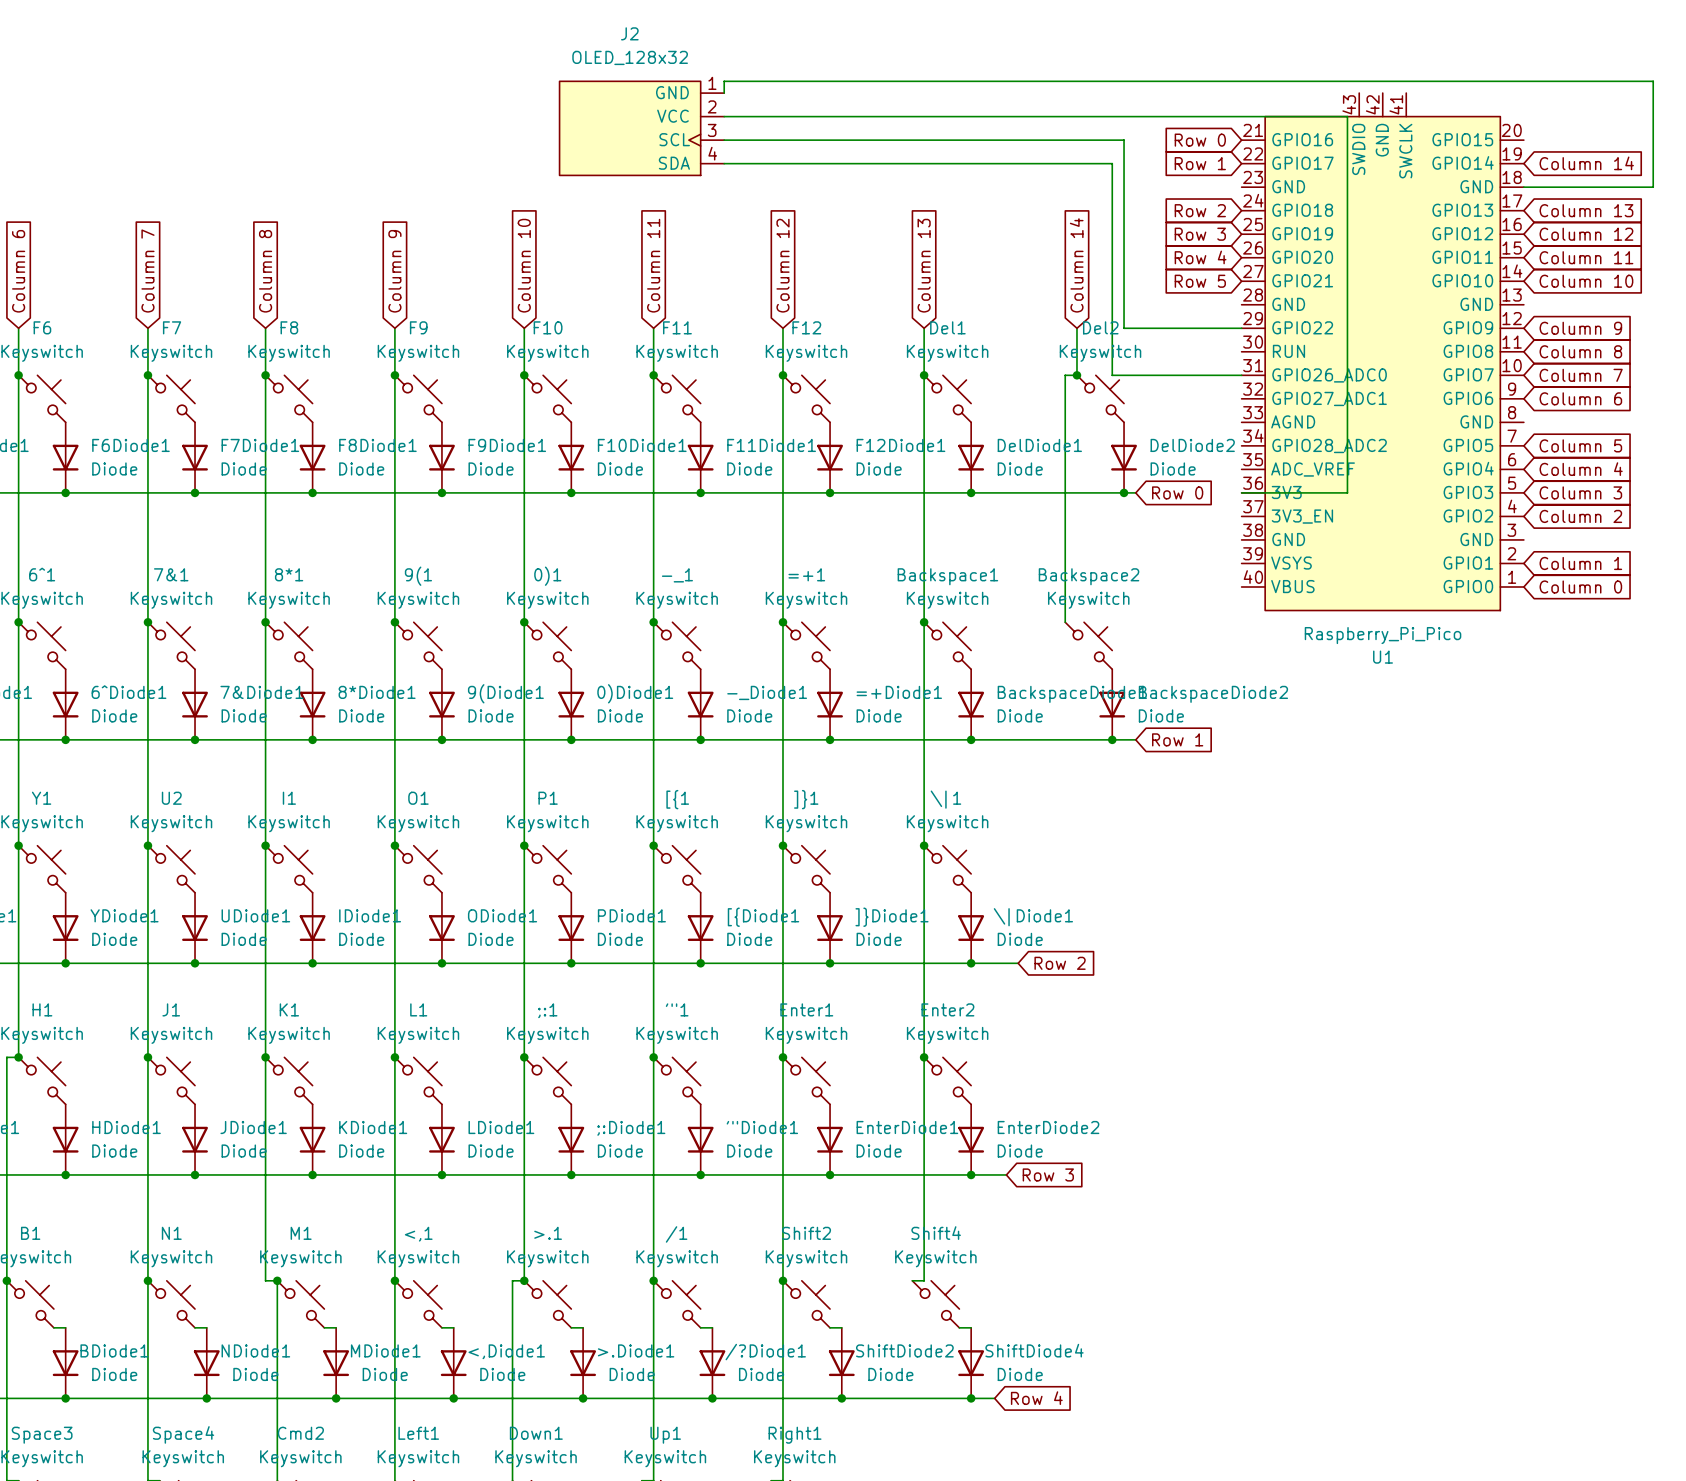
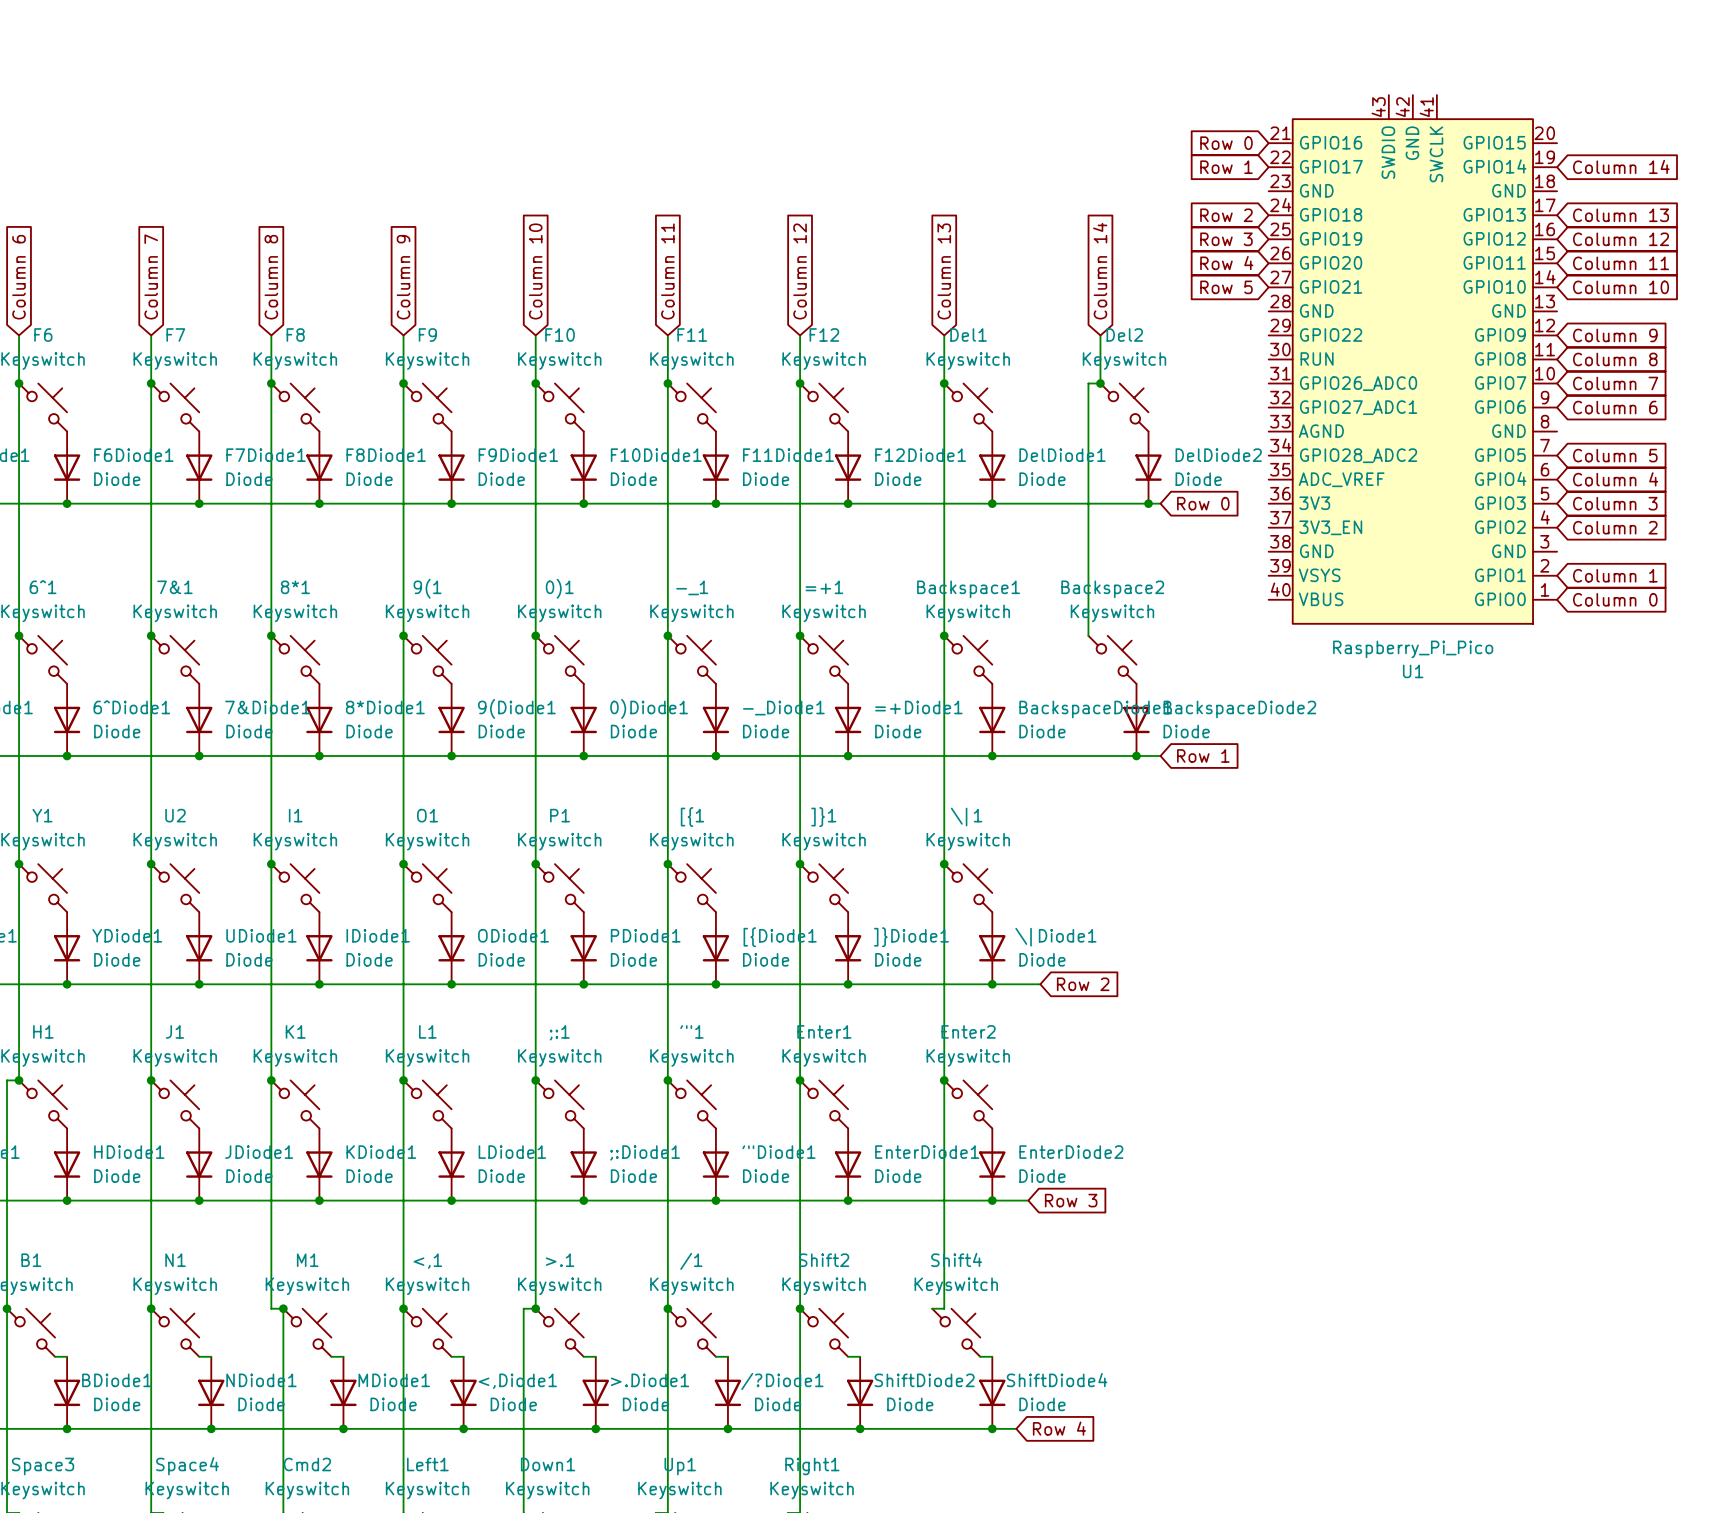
wire: (724, 93) (724, 81) (1653, 81) (1653, 187) (1523, 187) -> none
wire: (724, 116) (1347, 116) (1347, 492) (1241, 492) -> none
J2: OLED_128x32 (641, 128) -> none
wire: (724, 140) (1124, 140) (1124, 328) (1241, 328) -> none
wire: (724, 163) (1112, 163) (1112, 375) (1241, 375) -> none

